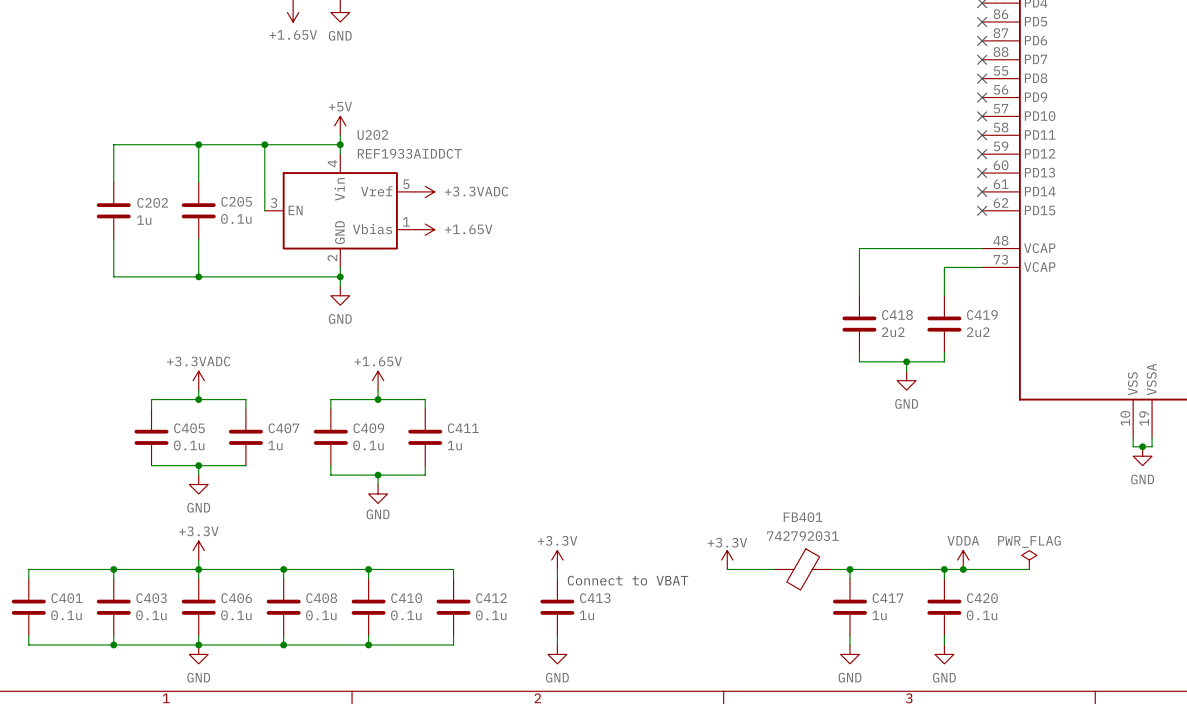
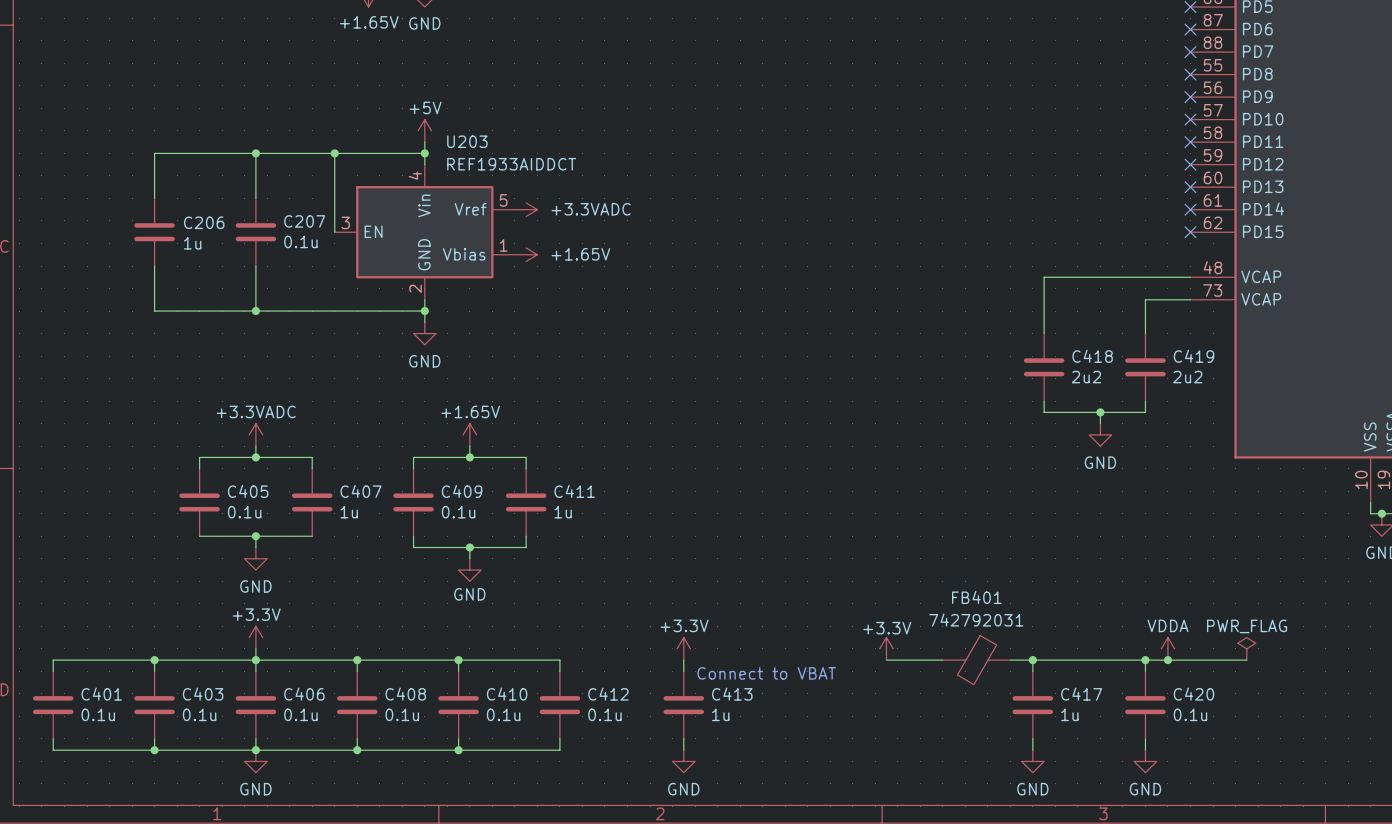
U202 name: U202 (372, 134) -> U203 (467, 141)
C205 name: C205 (236, 201) -> C207 (304, 221)
C202 name: C202 (152, 202) -> C206 (204, 222)

